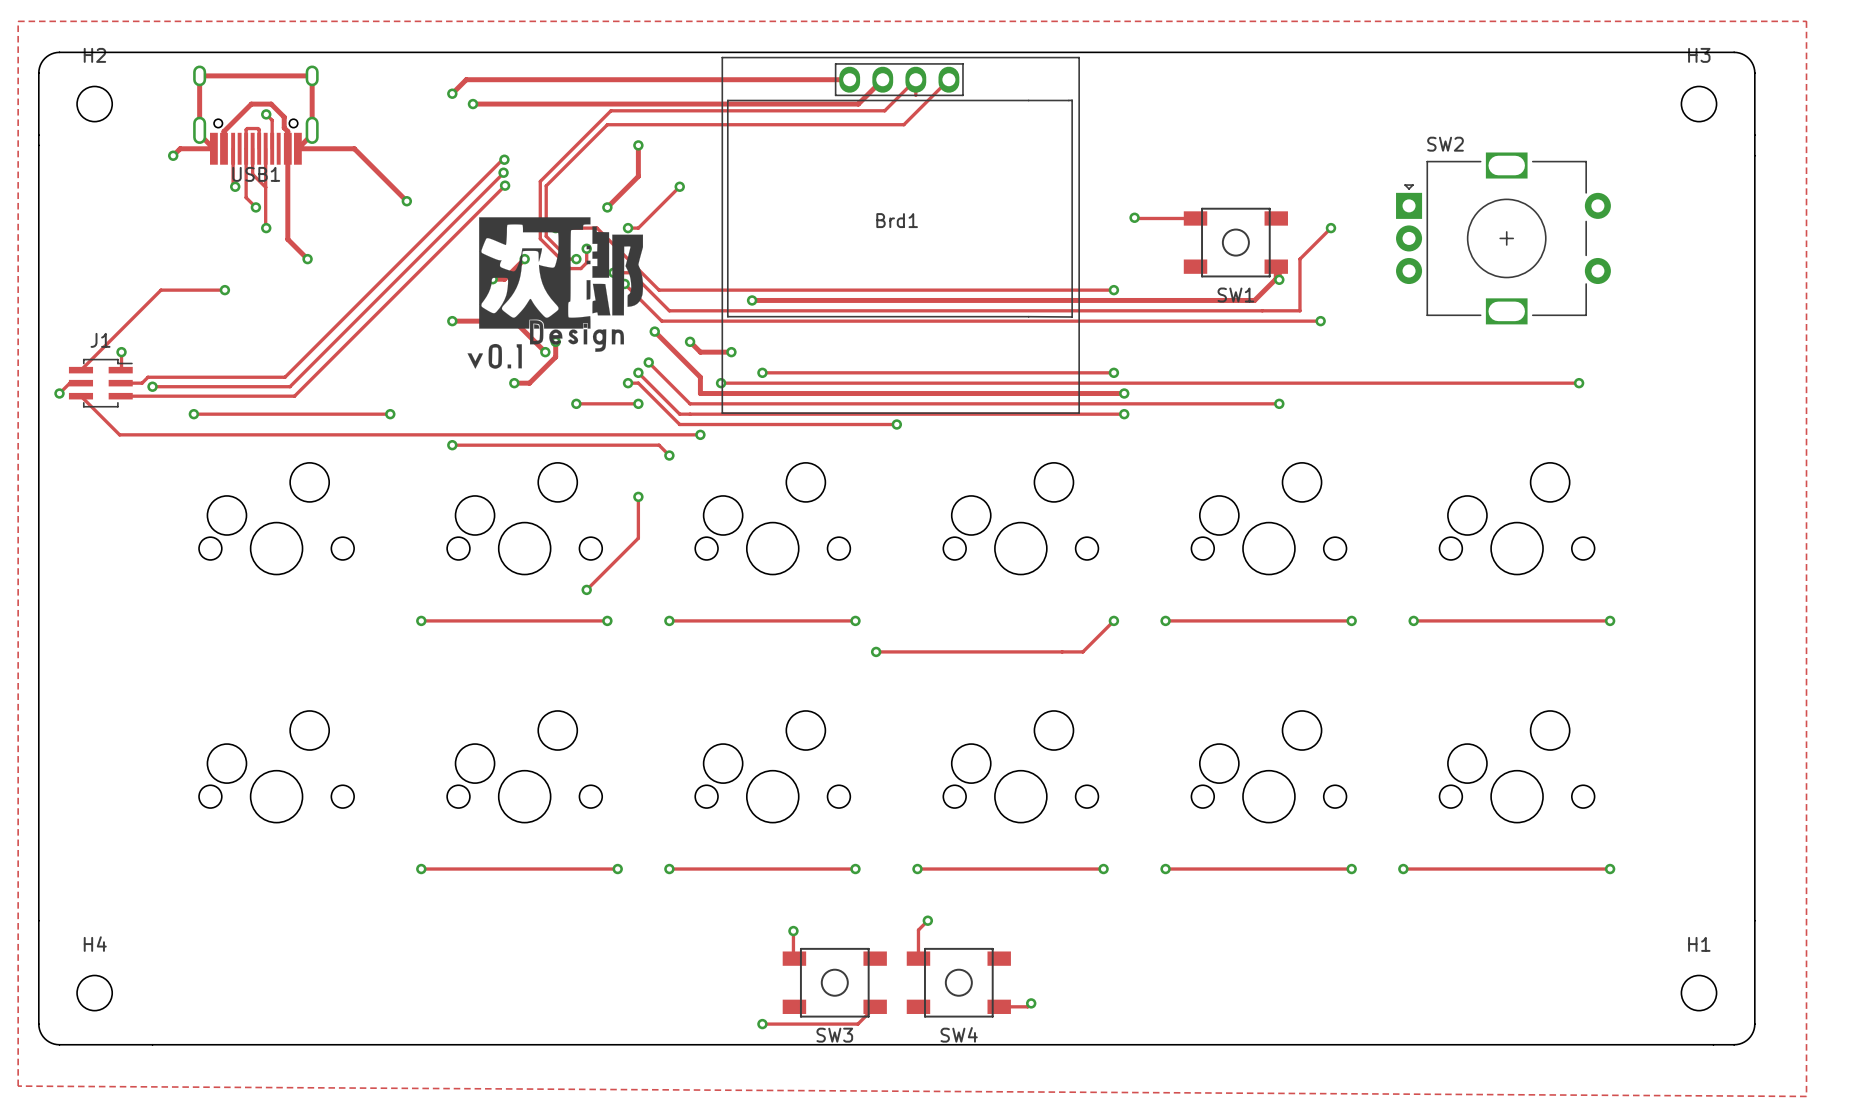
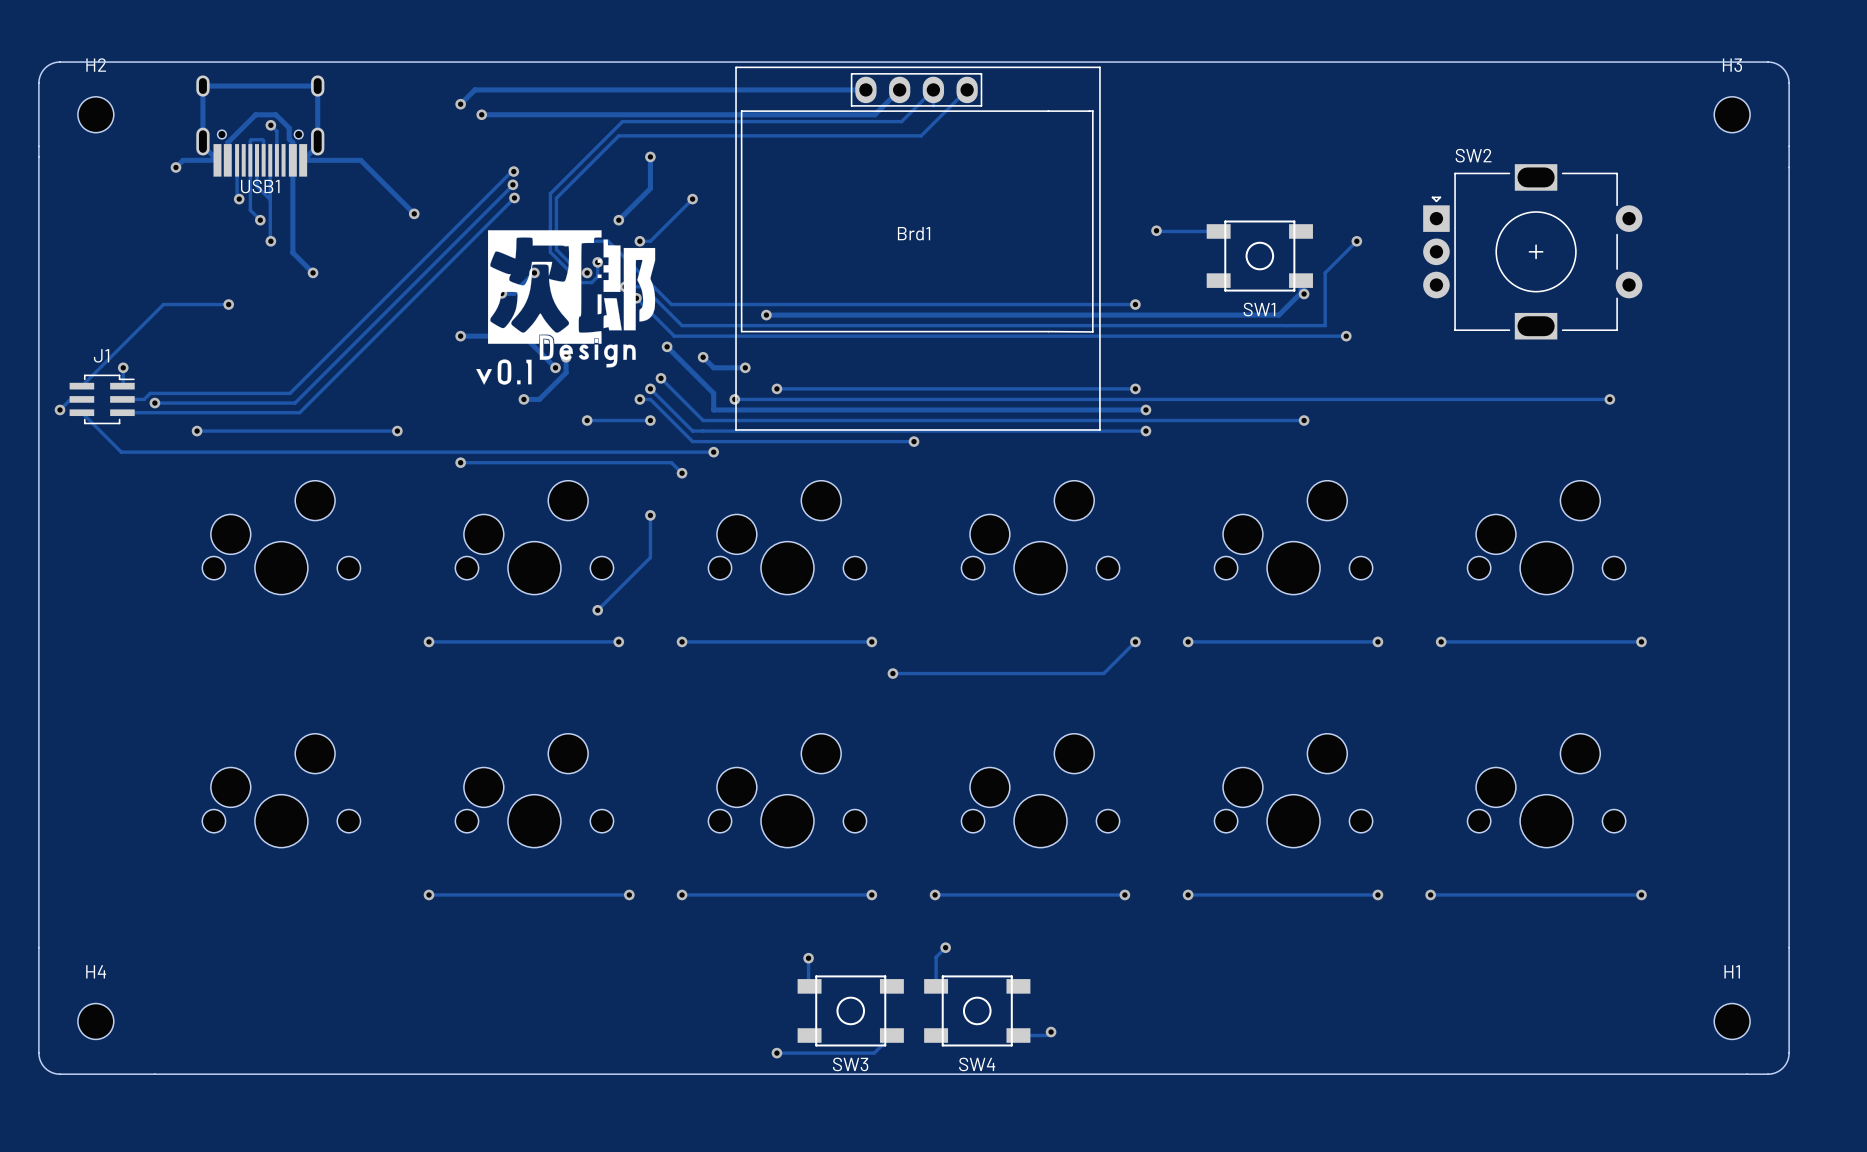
zone outline: (18, 21) (18, 1086) (1806, 1096) (1806, 21) (18, 21) -> none

